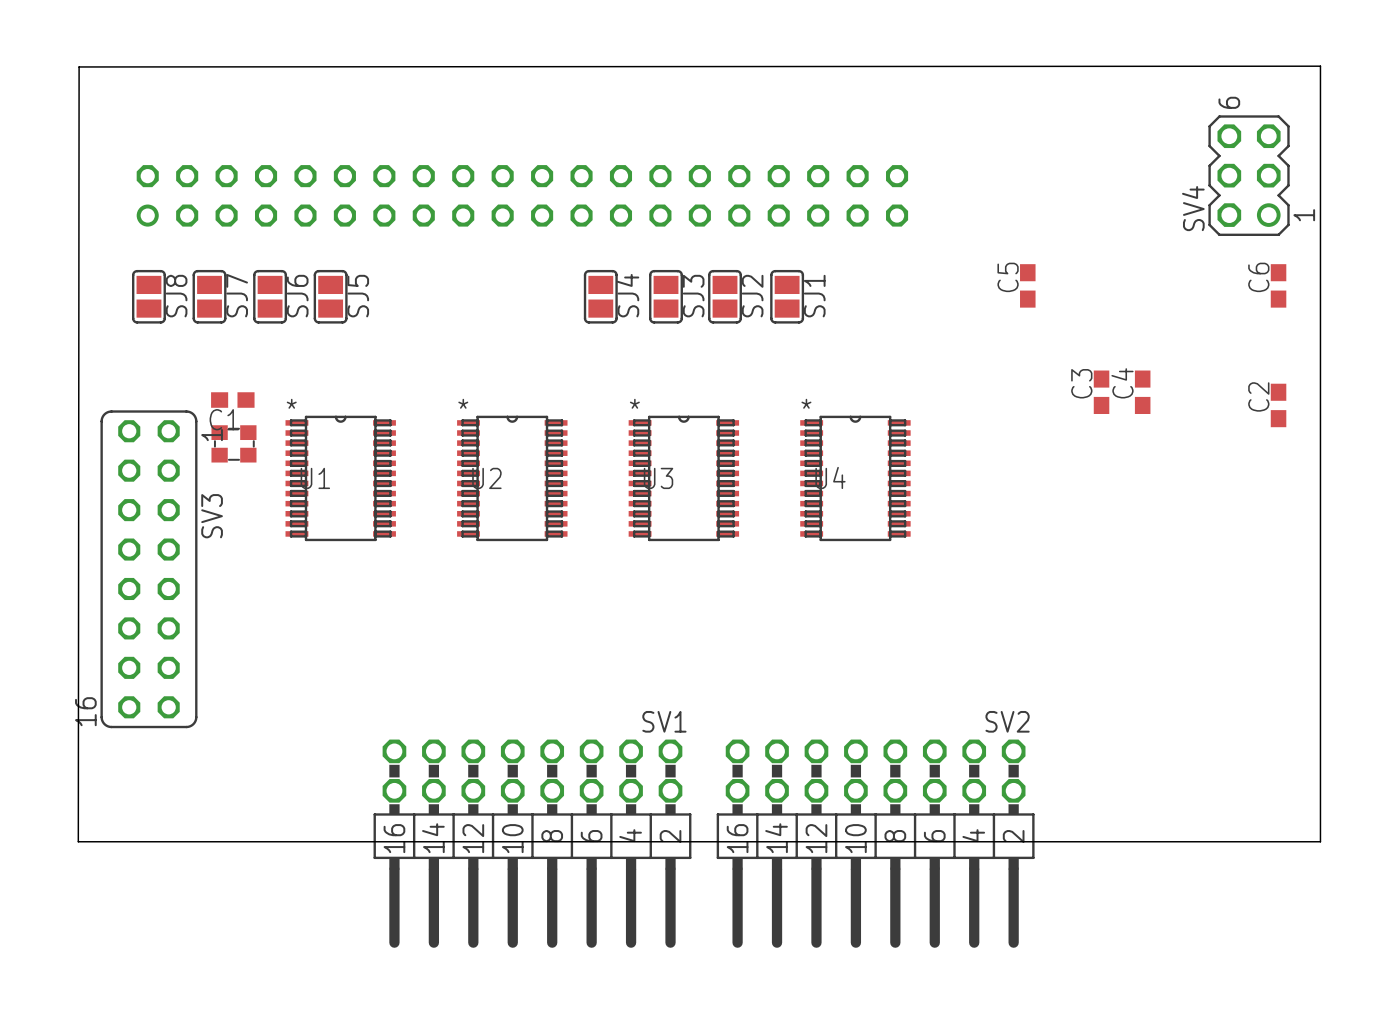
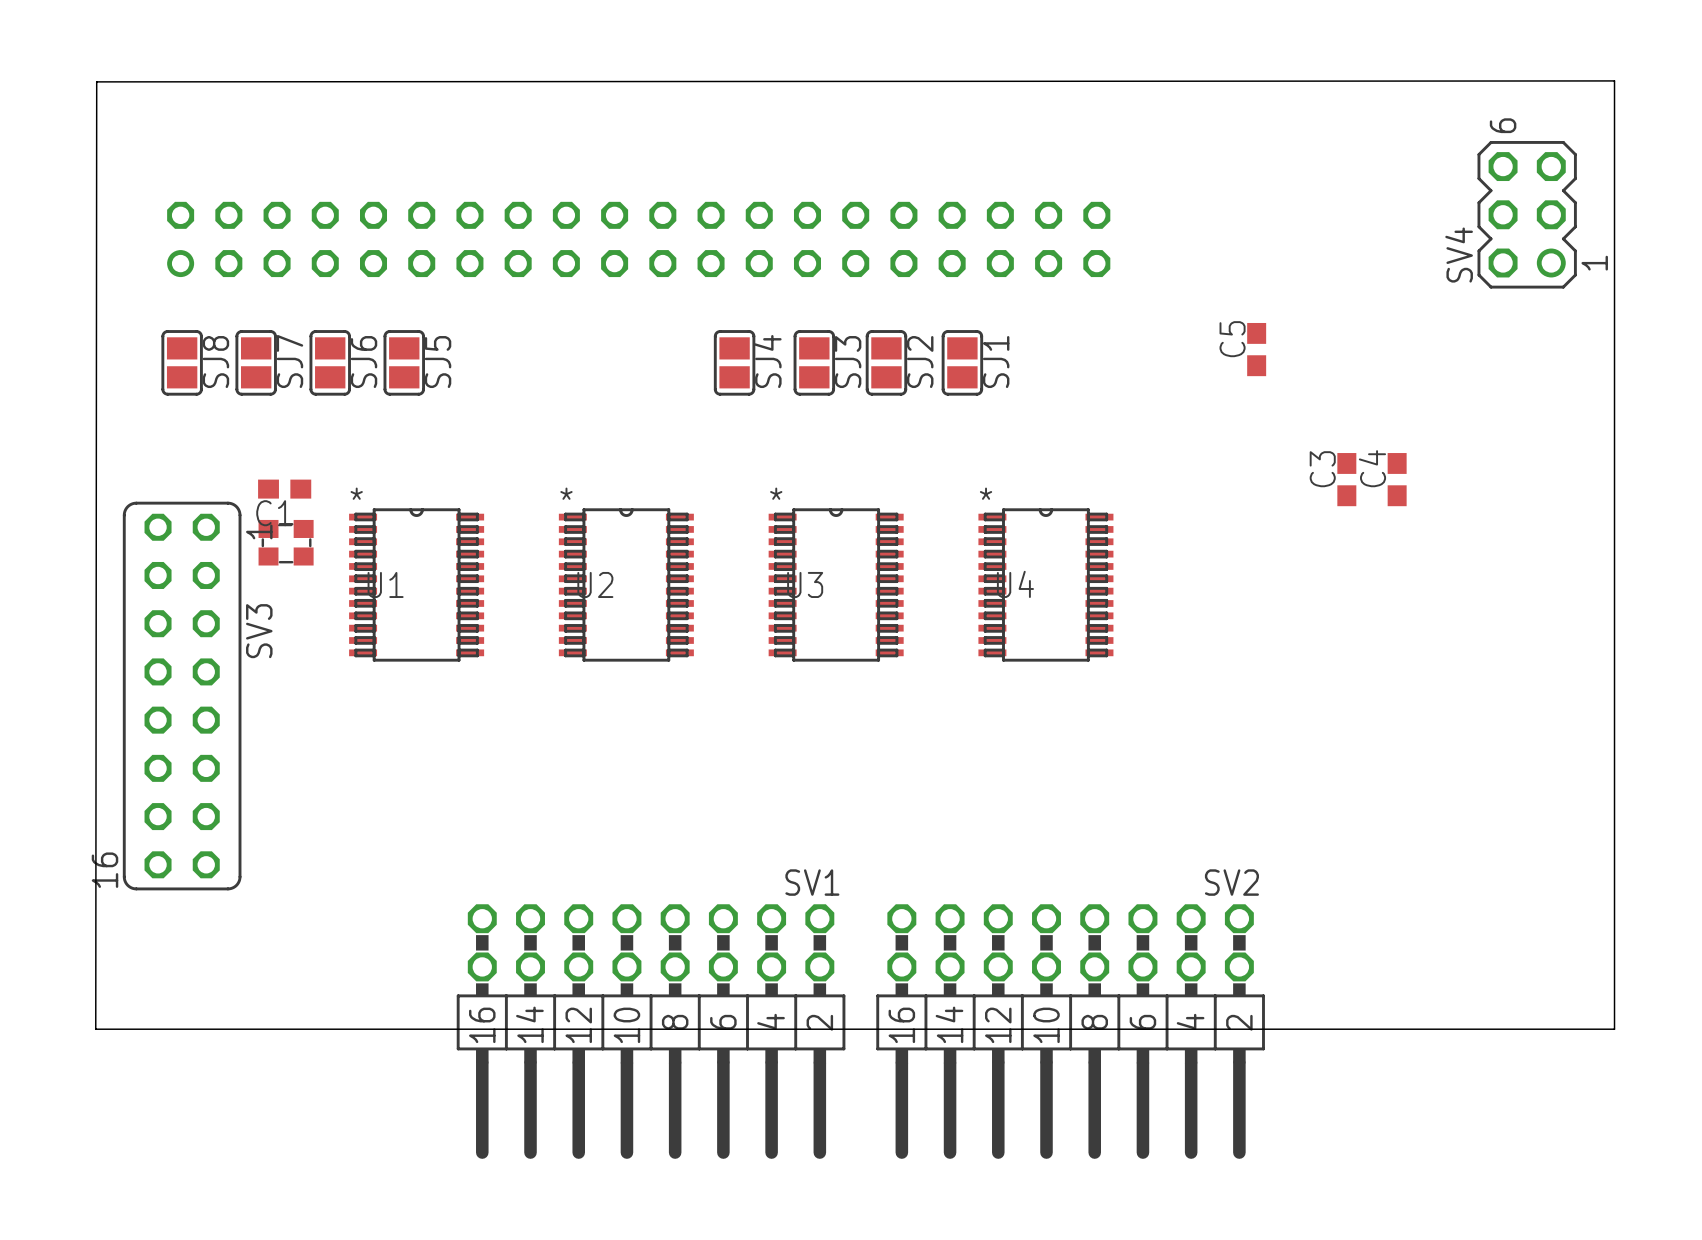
C6: (1278, 285) -> none
C2: (1278, 405) -> none

